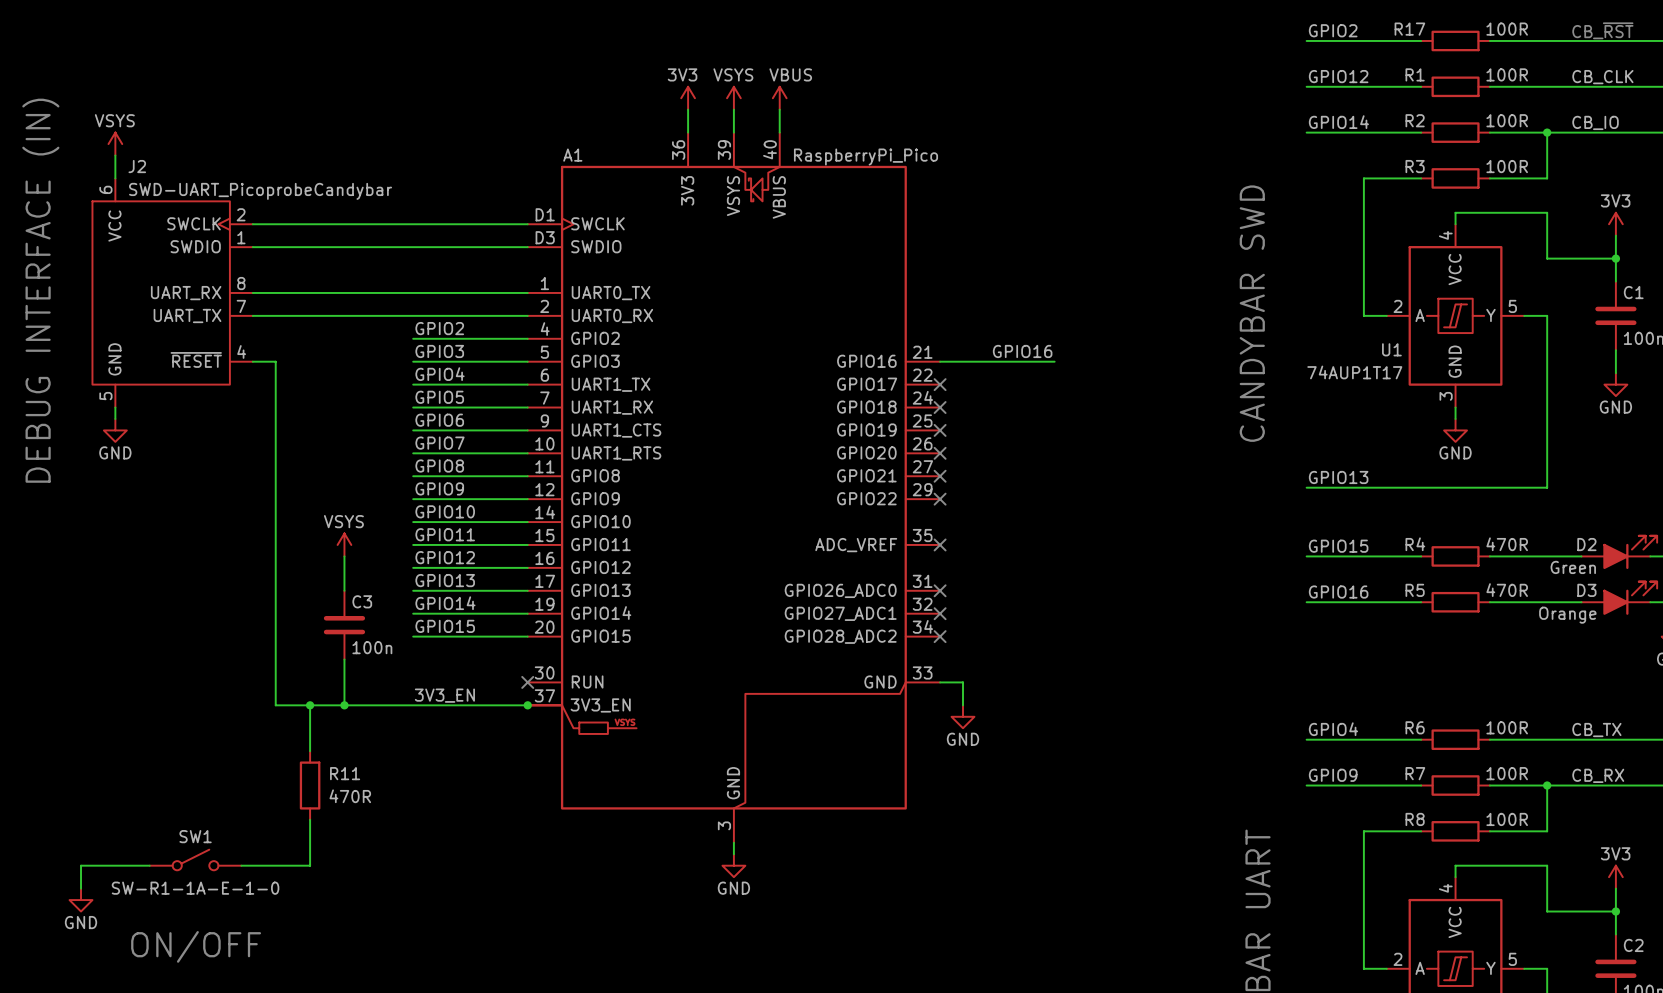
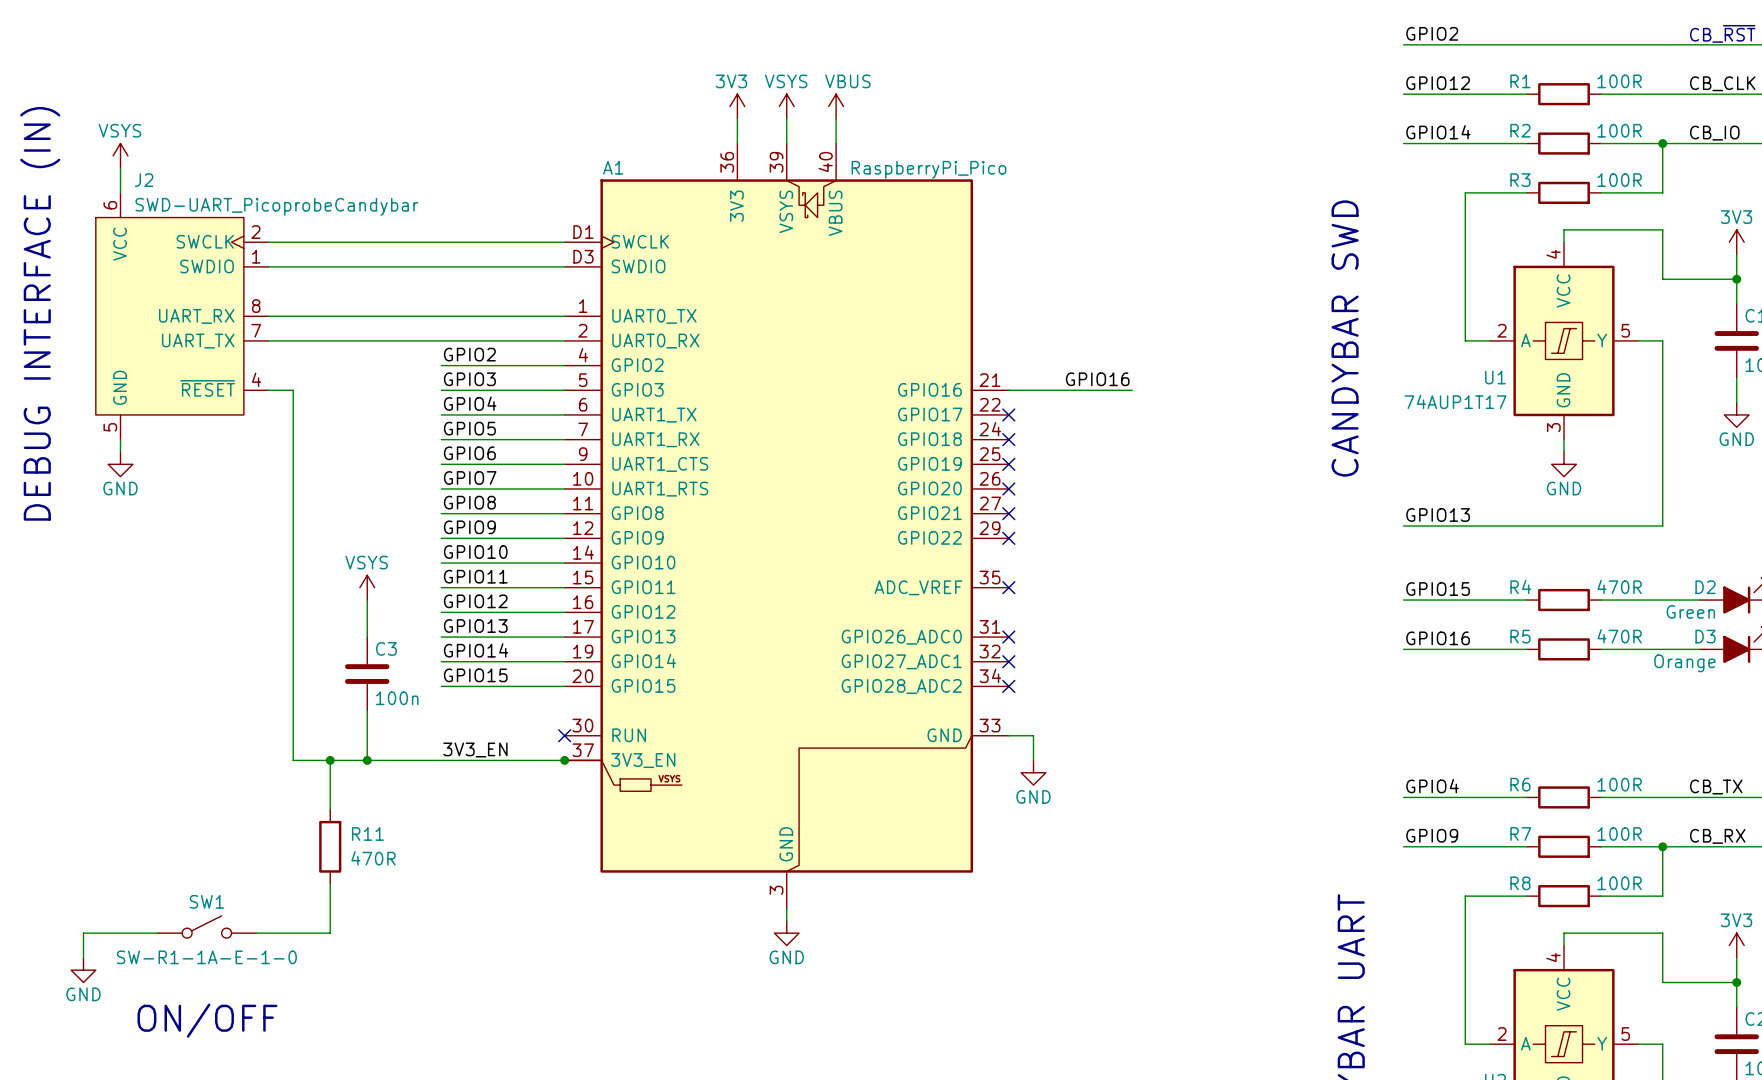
wire: none -> (1527, 44) (1601, 44)
R17: 100R (1455, 40) -> none

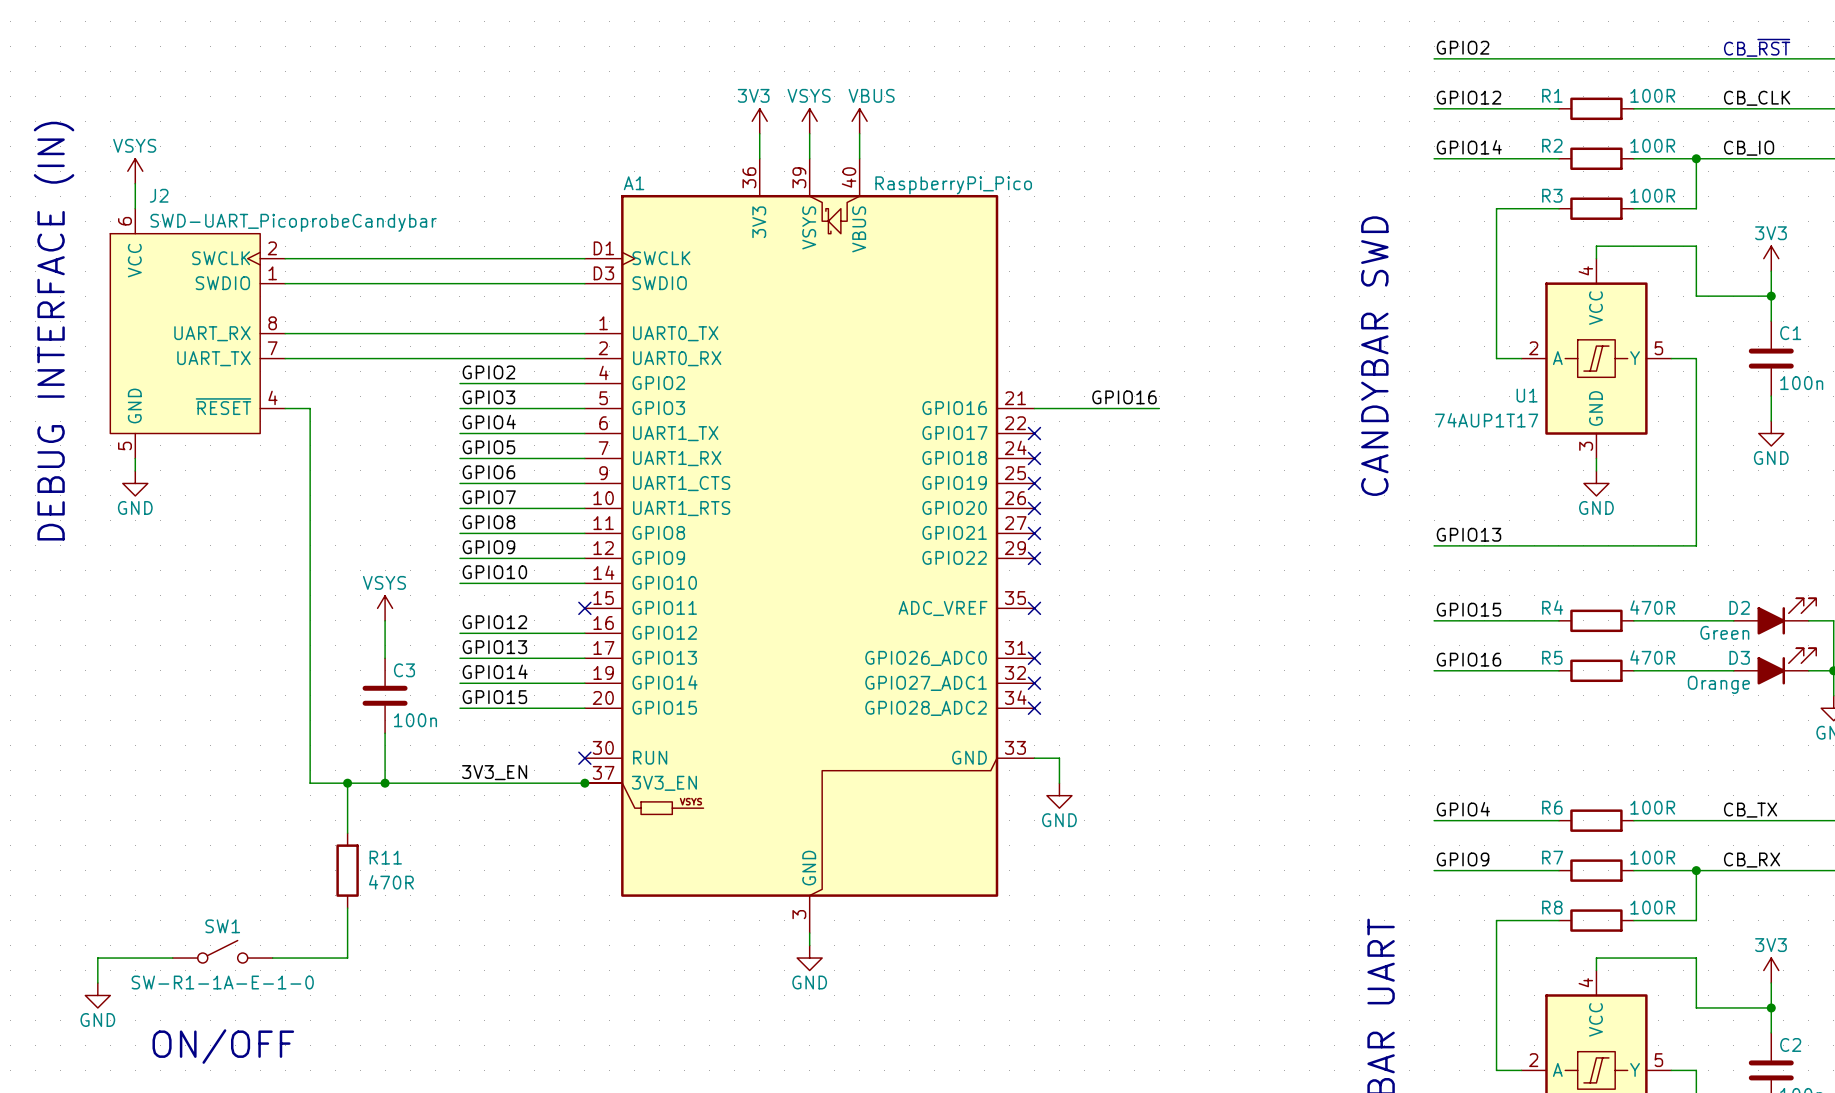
label: GPIO11 (475, 576) -> none
wire: (441, 587) (564, 587) -> none
no-connect mark: none -> (584, 608)

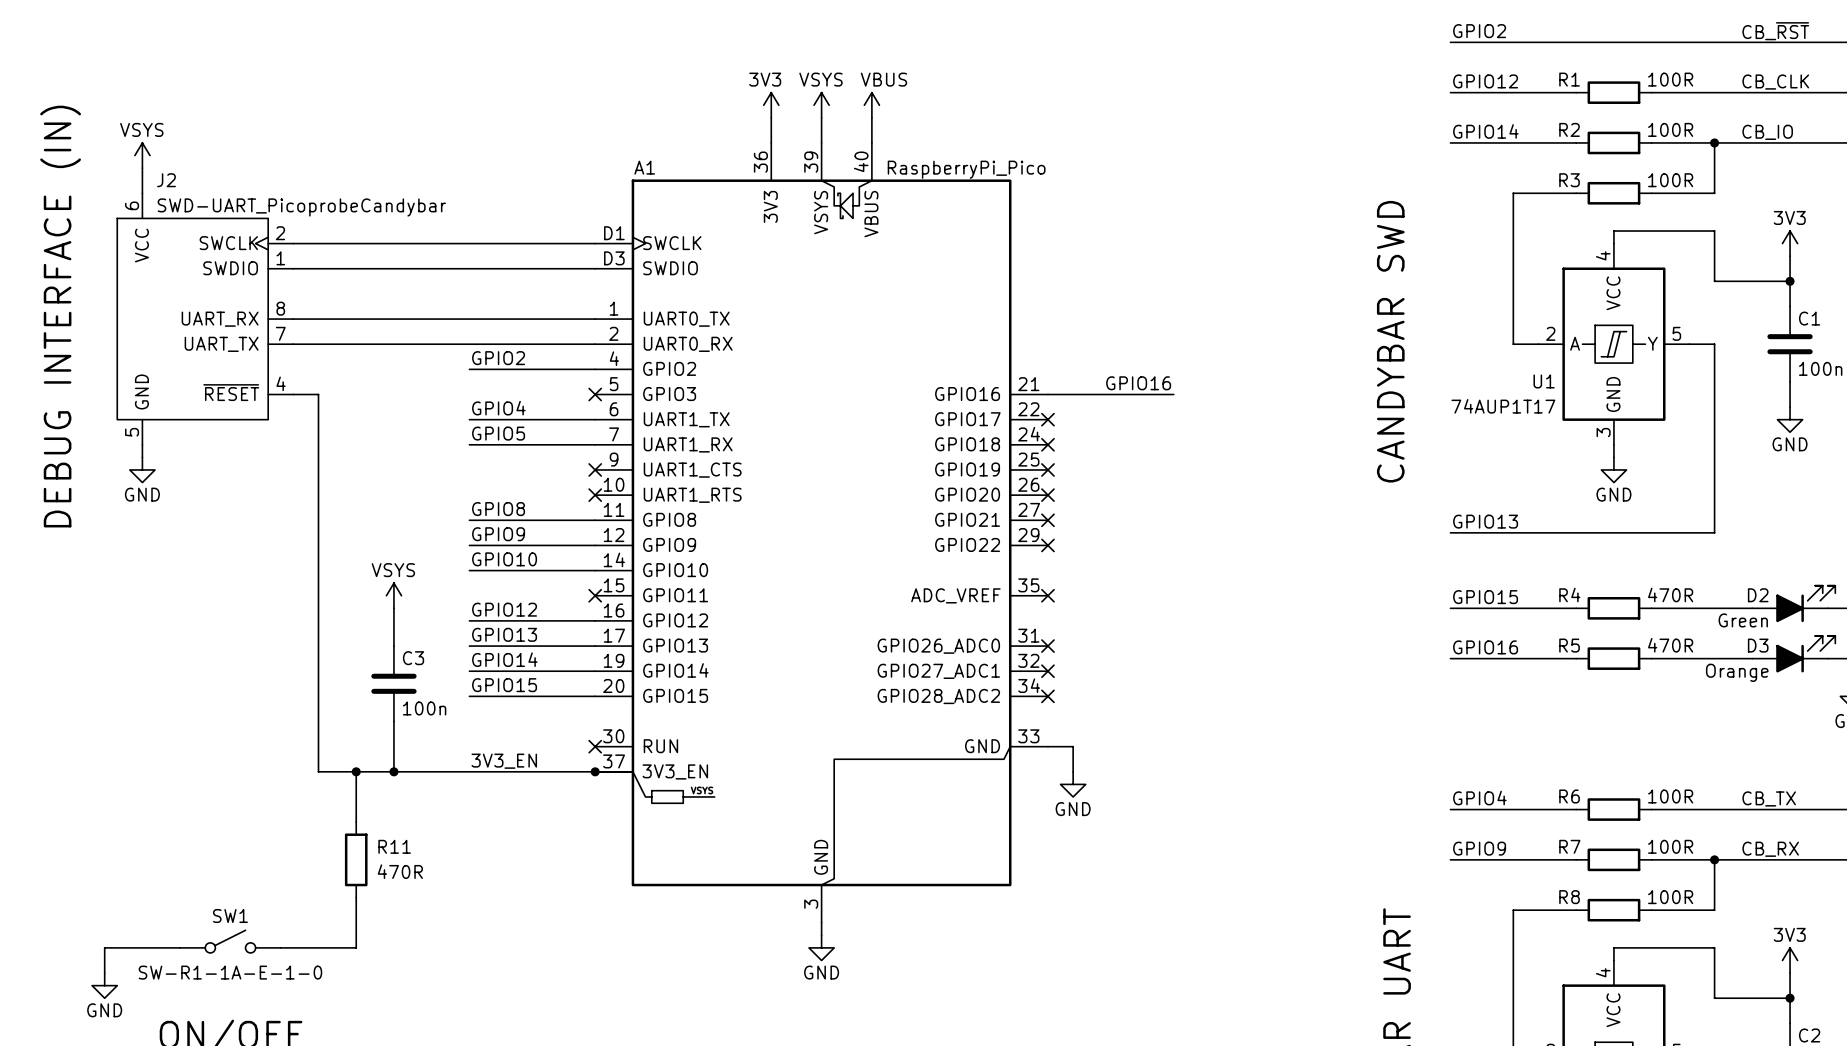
label: GPIO3 (488, 397) -> none
wire: (459, 408) (584, 408) -> none
no-connect mark: none -> (595, 394)
label: GPIO6 (488, 472) -> none
wire: (459, 483) (584, 483) -> none
no-connect mark: none -> (595, 469)
label: GPIO7 (489, 497) -> none
wire: (459, 508) (584, 508) -> none
no-connect mark: none -> (595, 495)

